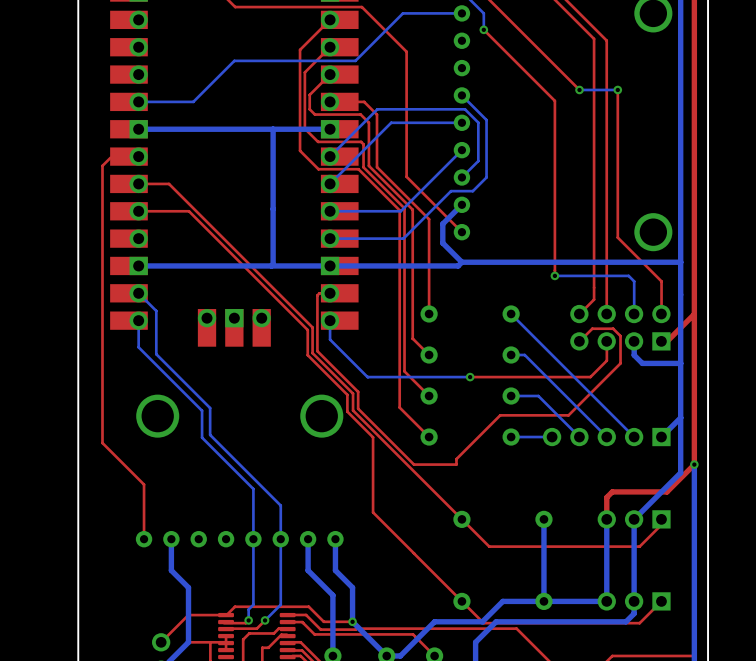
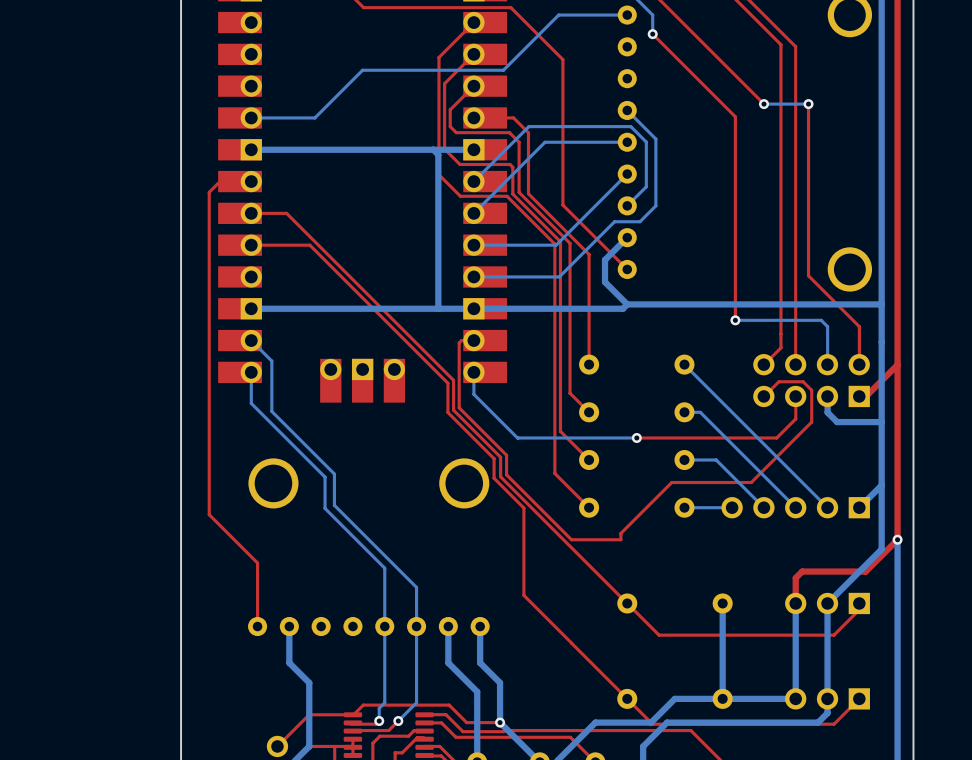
bottom track: (273, 129) (273, 264) (271, 265) -> none
bottom track: none -> (433, 149) (438, 154) (438, 308)

